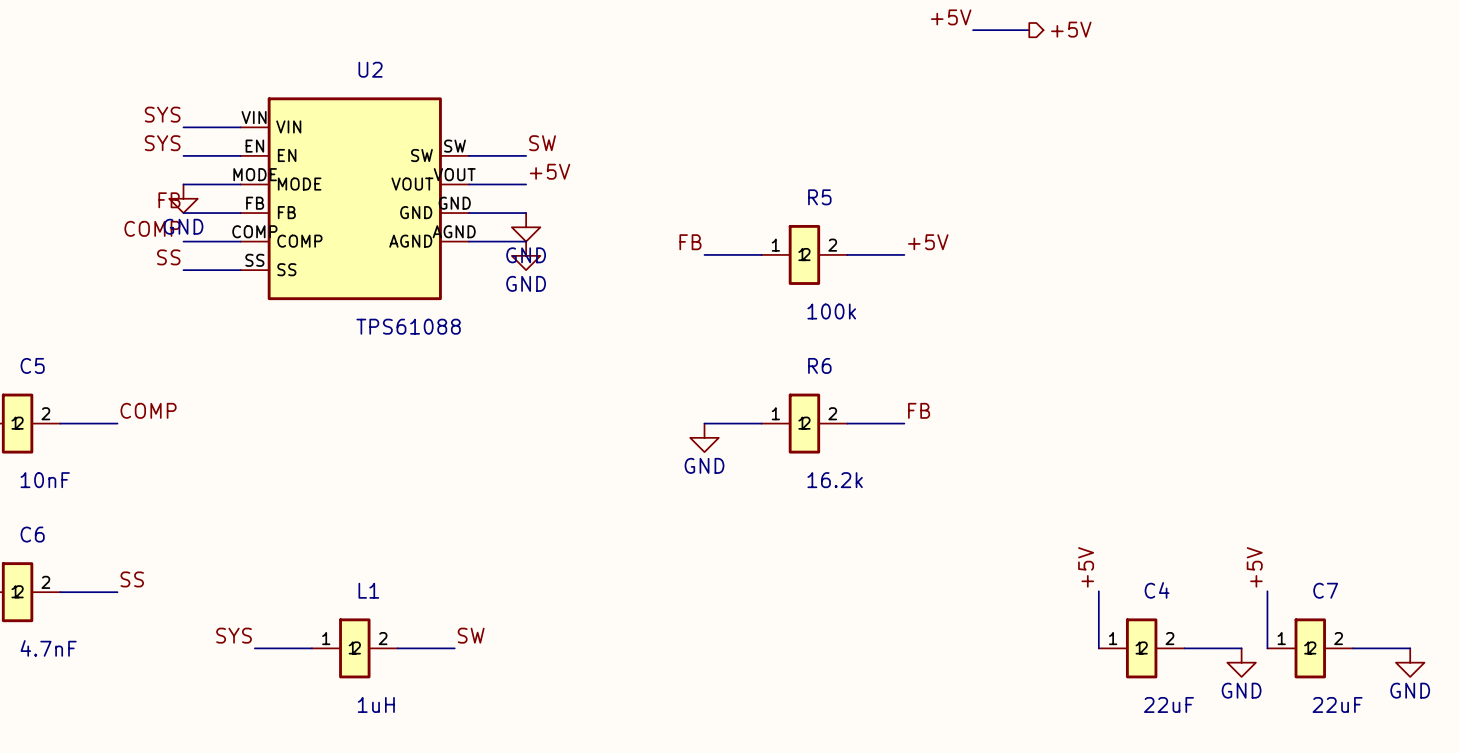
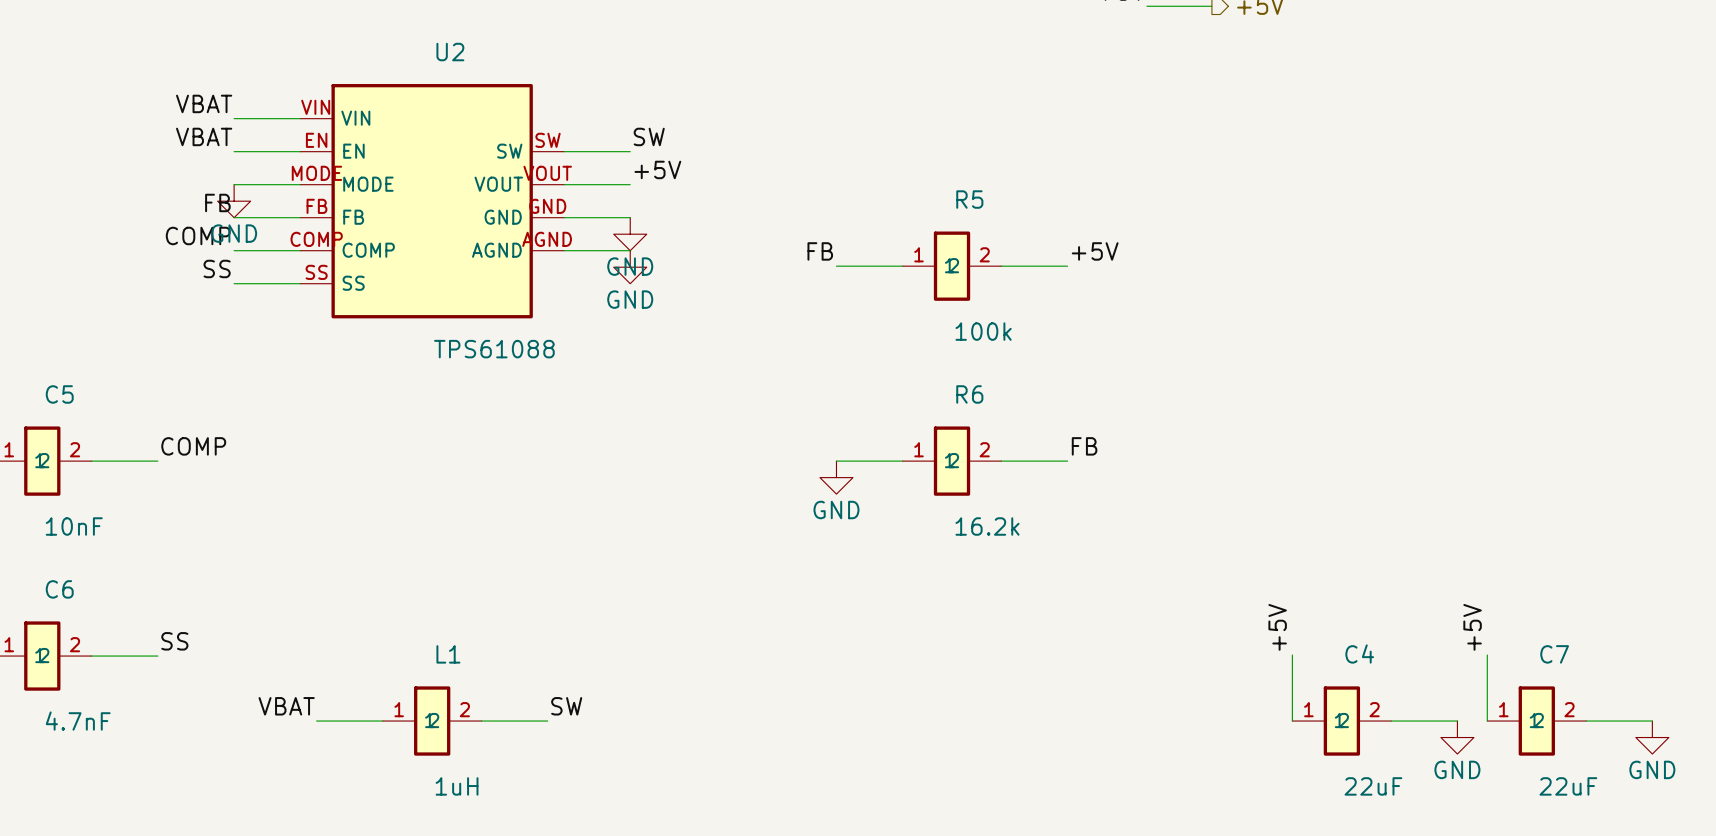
label: SYS (162, 114) -> VBAT (204, 103)
label: SYS (162, 143) -> VBAT (204, 136)
label: SYS (234, 635) -> VBAT (286, 706)

